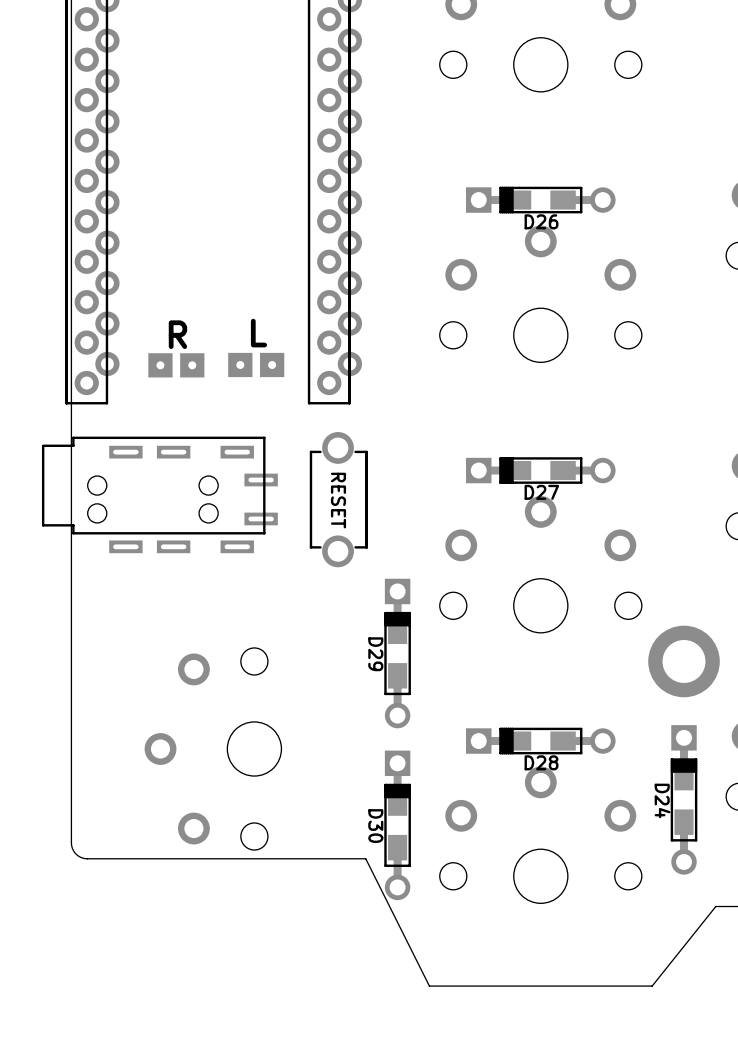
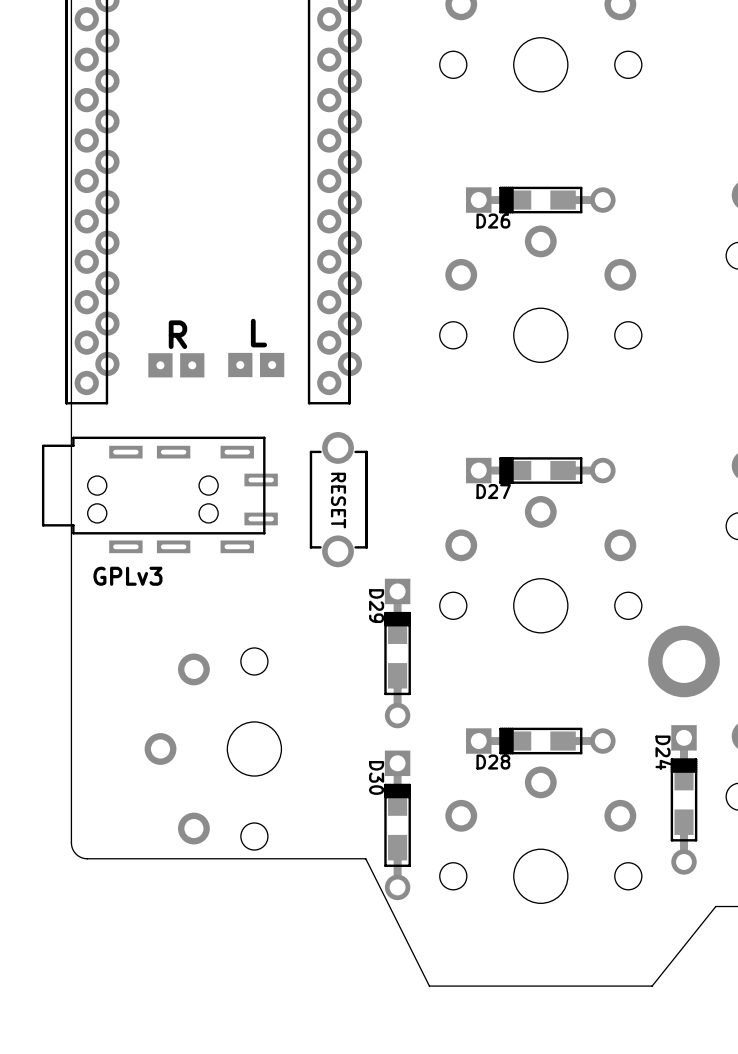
D26 name position: D26 (541, 221) -> D26 (493, 221)
D27 name position: D27 (541, 492) -> D27 (493, 491)
text: none -> GPLv3 (127, 576)
D29 name position: D29 (375, 654) -> D29 (376, 606)
D28 name position: D28 (541, 762) -> D28 (493, 762)
D24 name position: D24 (662, 800) -> D24 (663, 752)
D30 name position: D30 (375, 826) -> D30 (376, 777)

